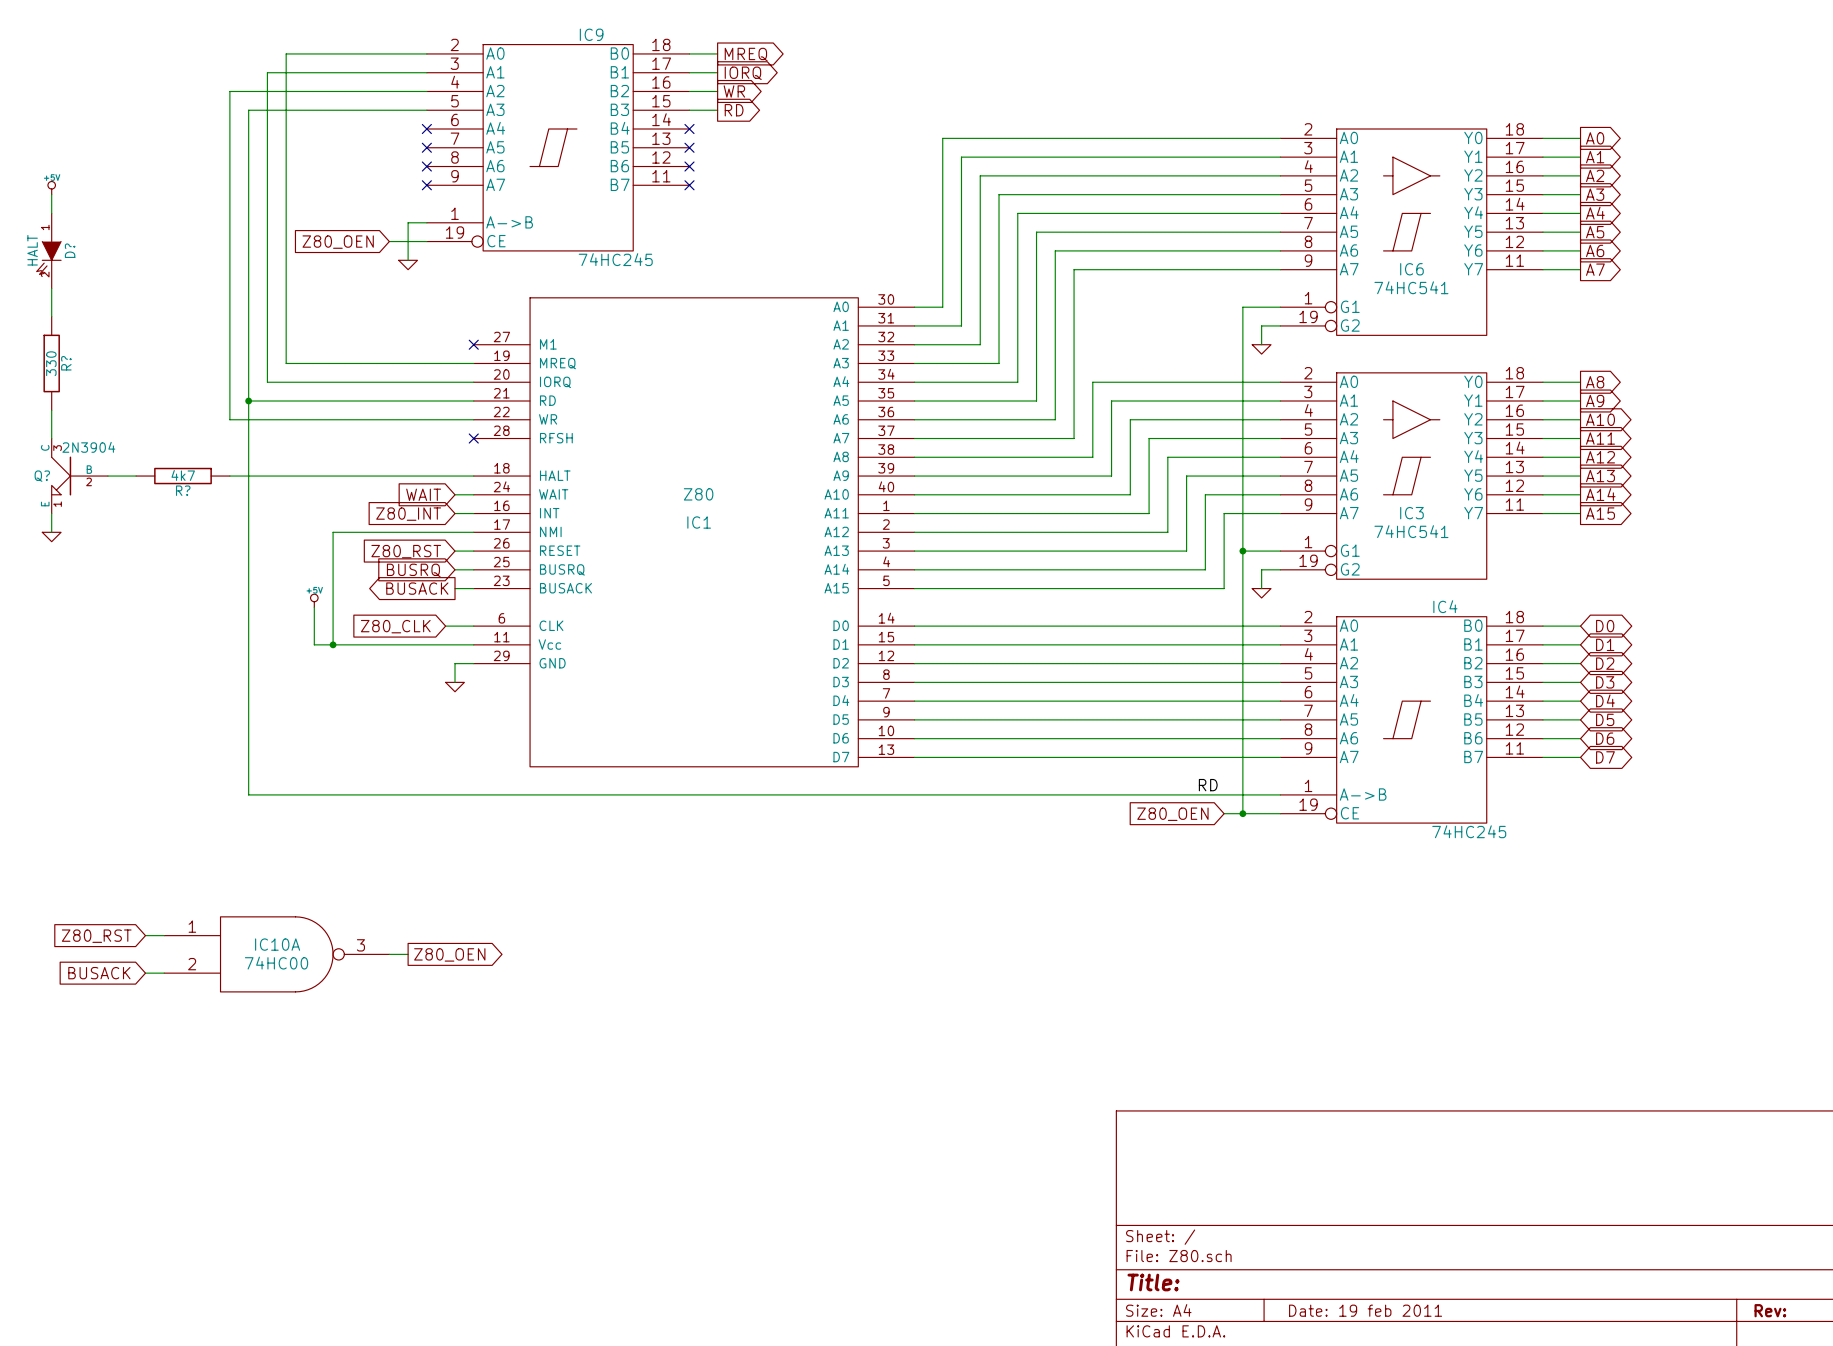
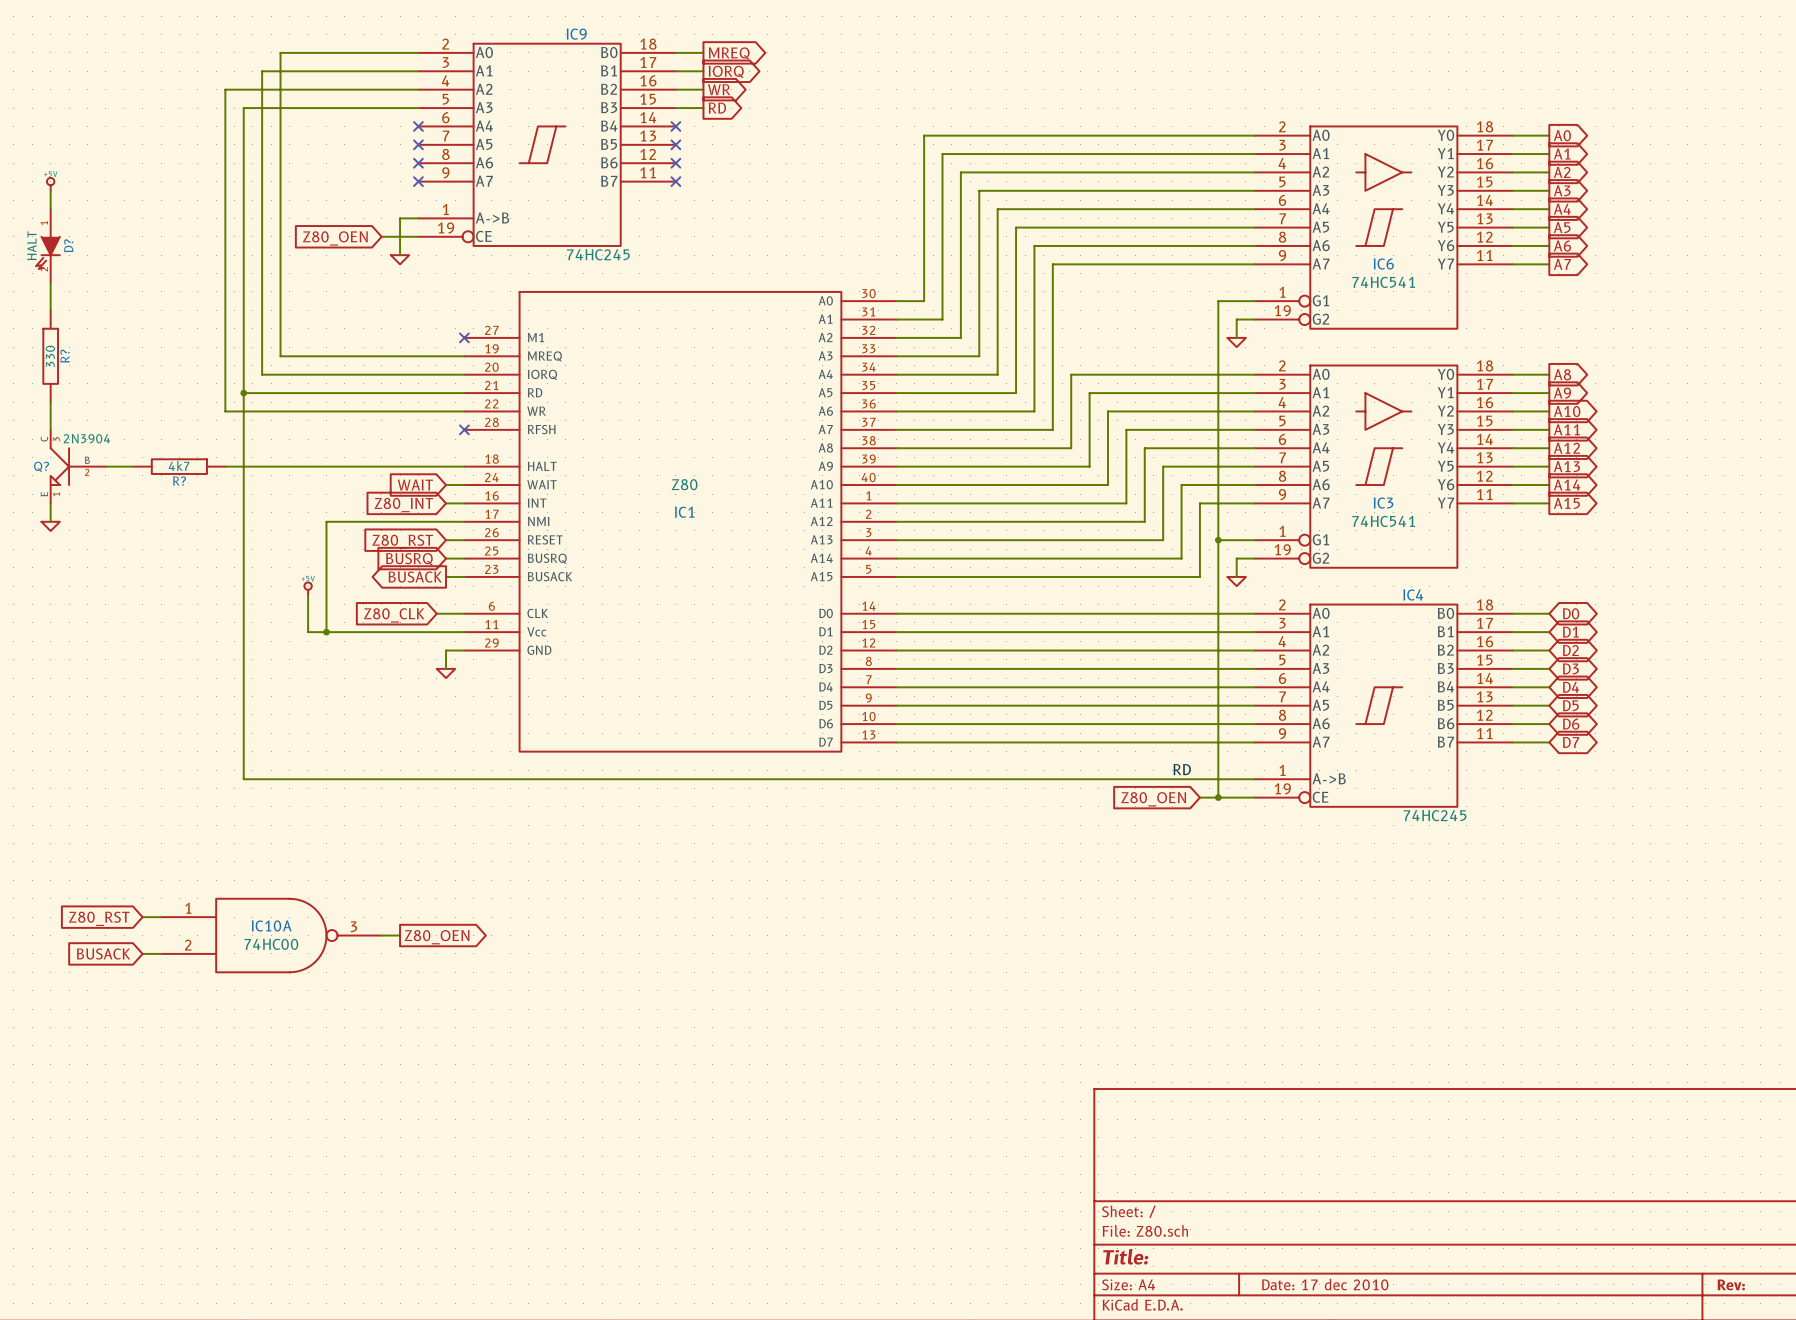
title block: Date: 19 feb 2011 (1365, 1310) -> Date: 17 dec 2010 (1325, 1284)

